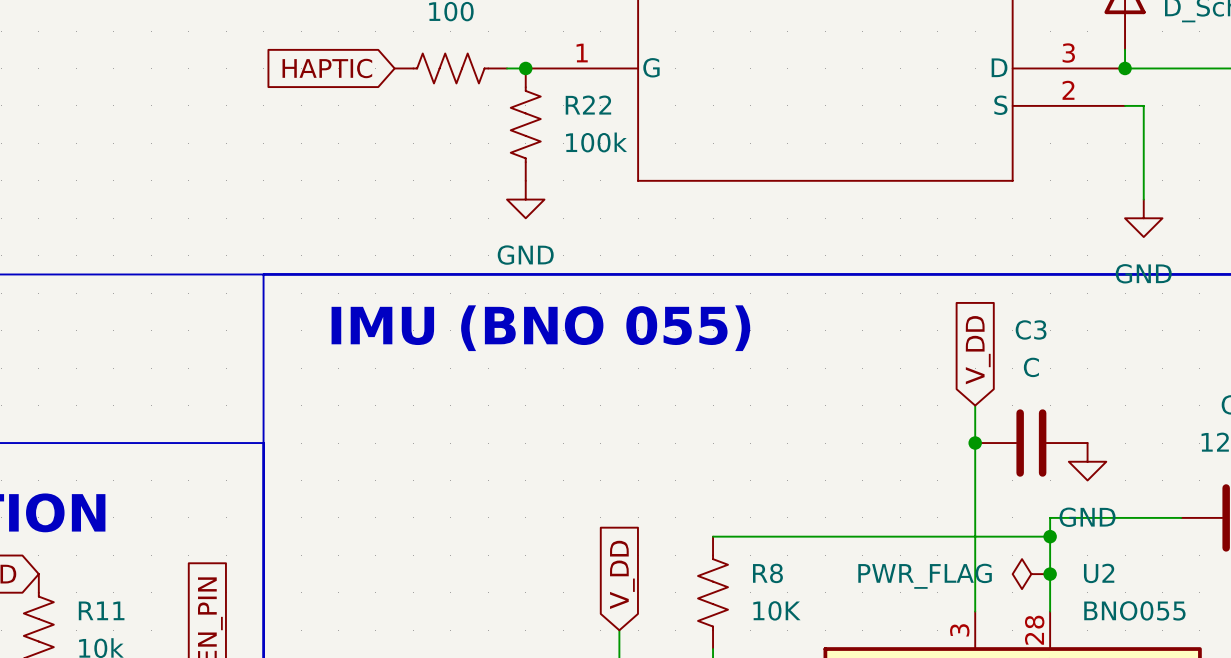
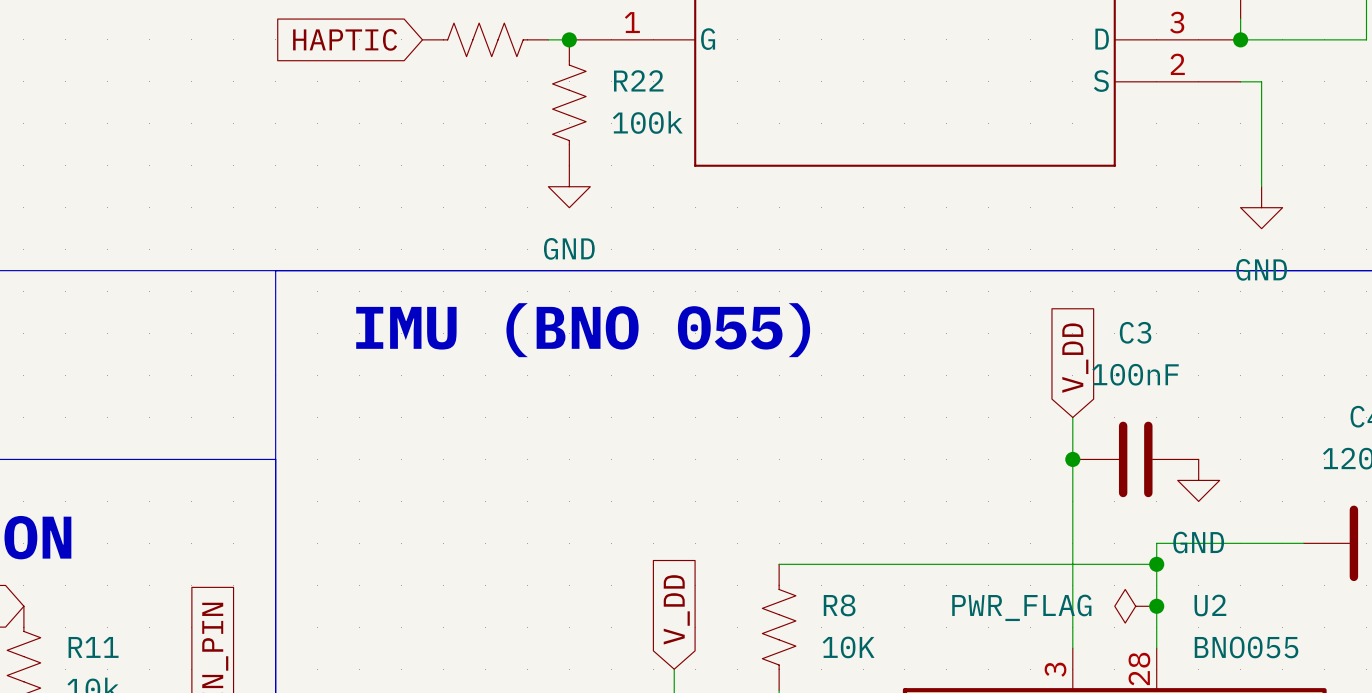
C3 value: C (1031, 367) -> 100nF (1135, 374)

